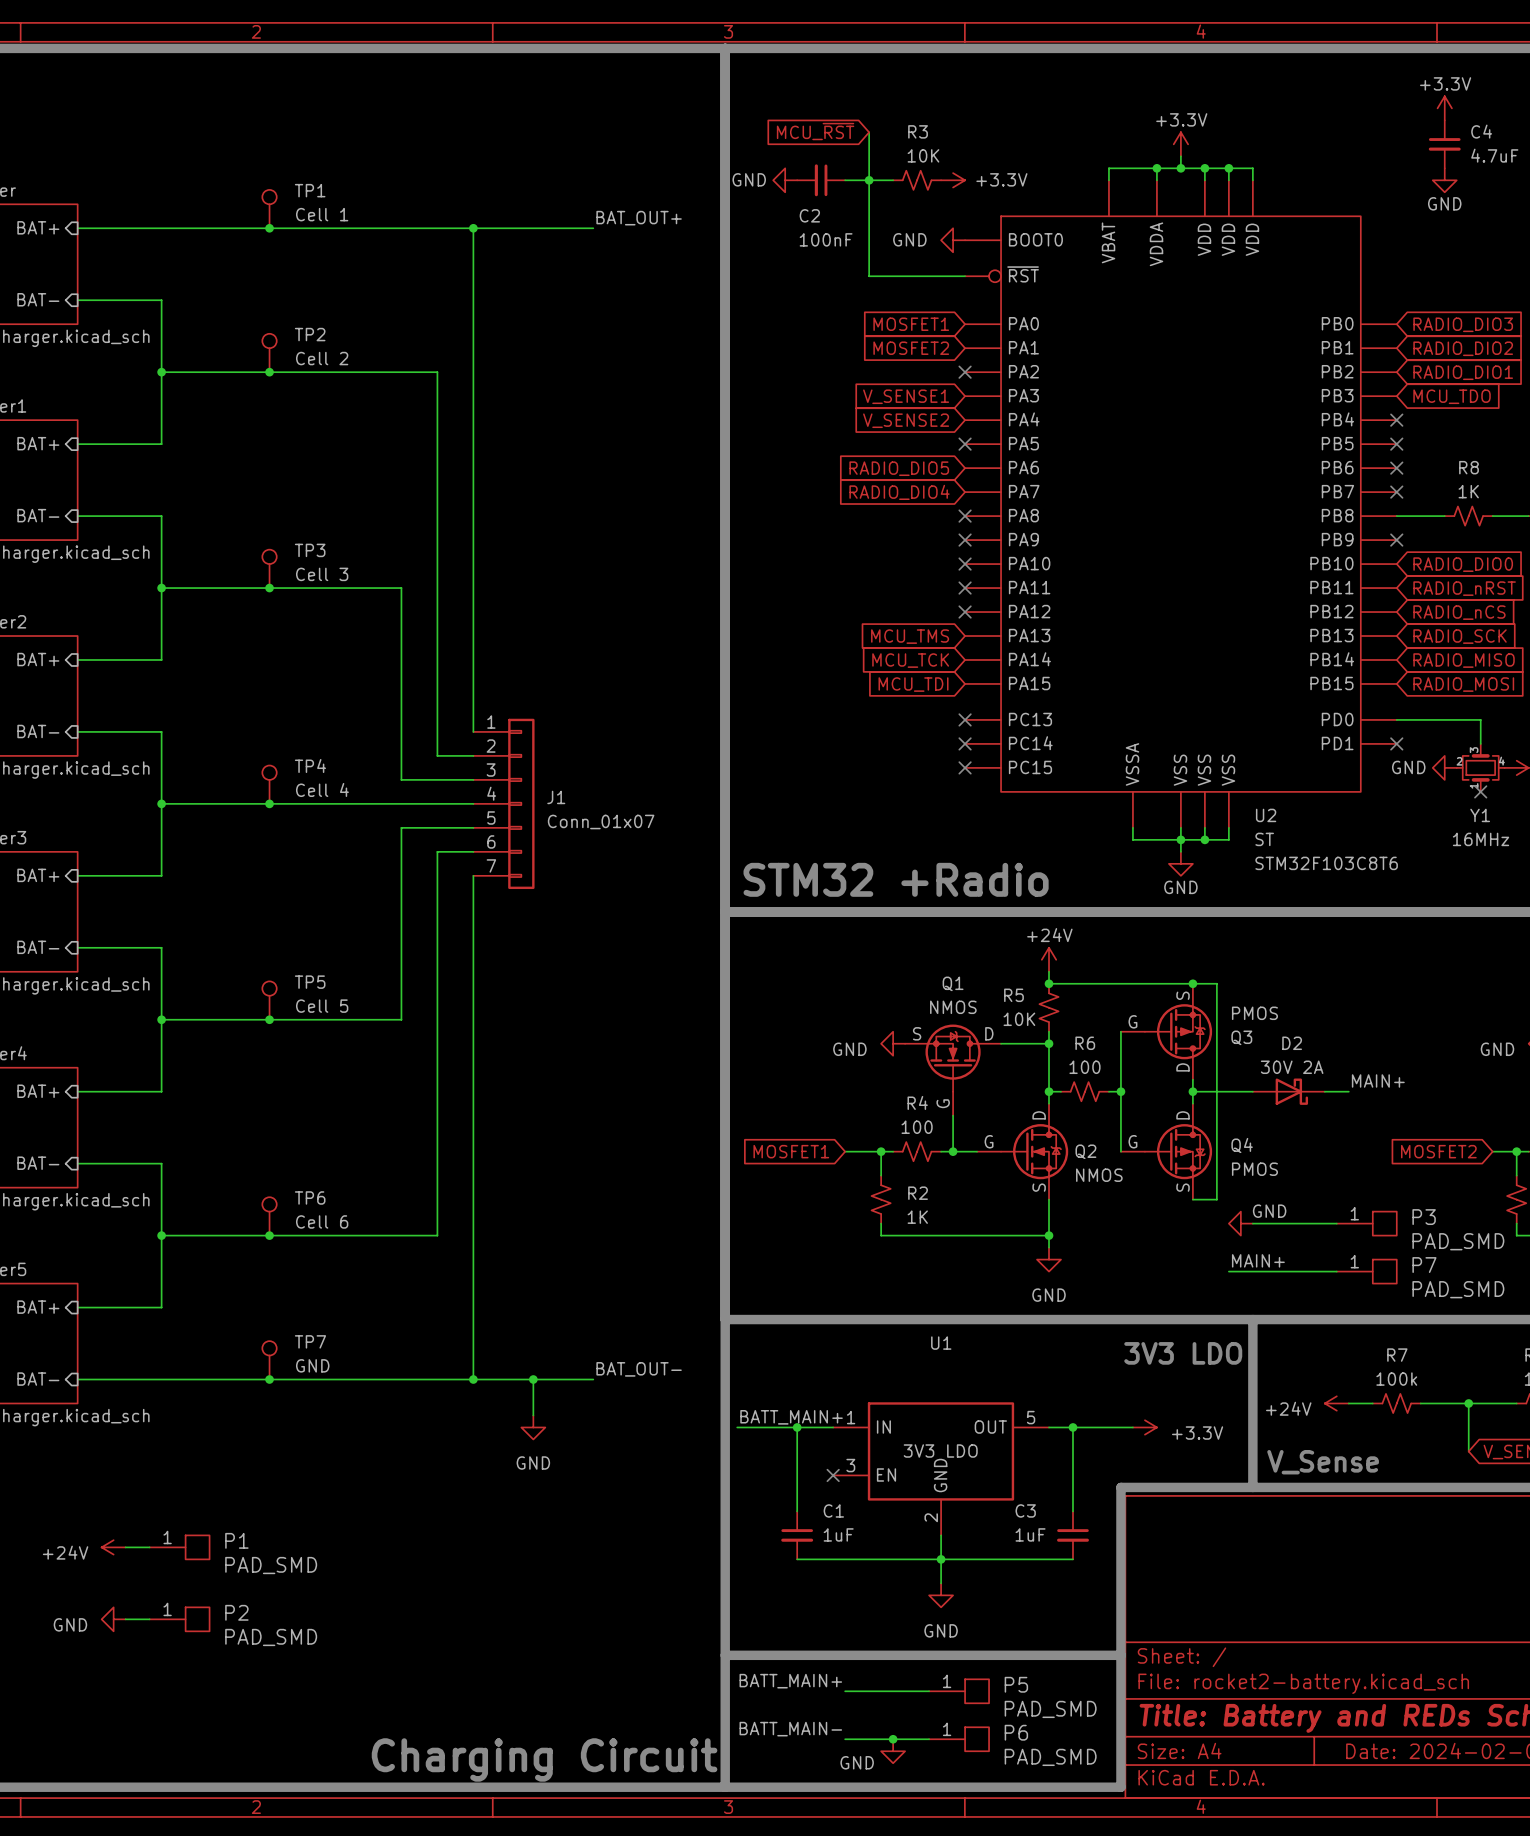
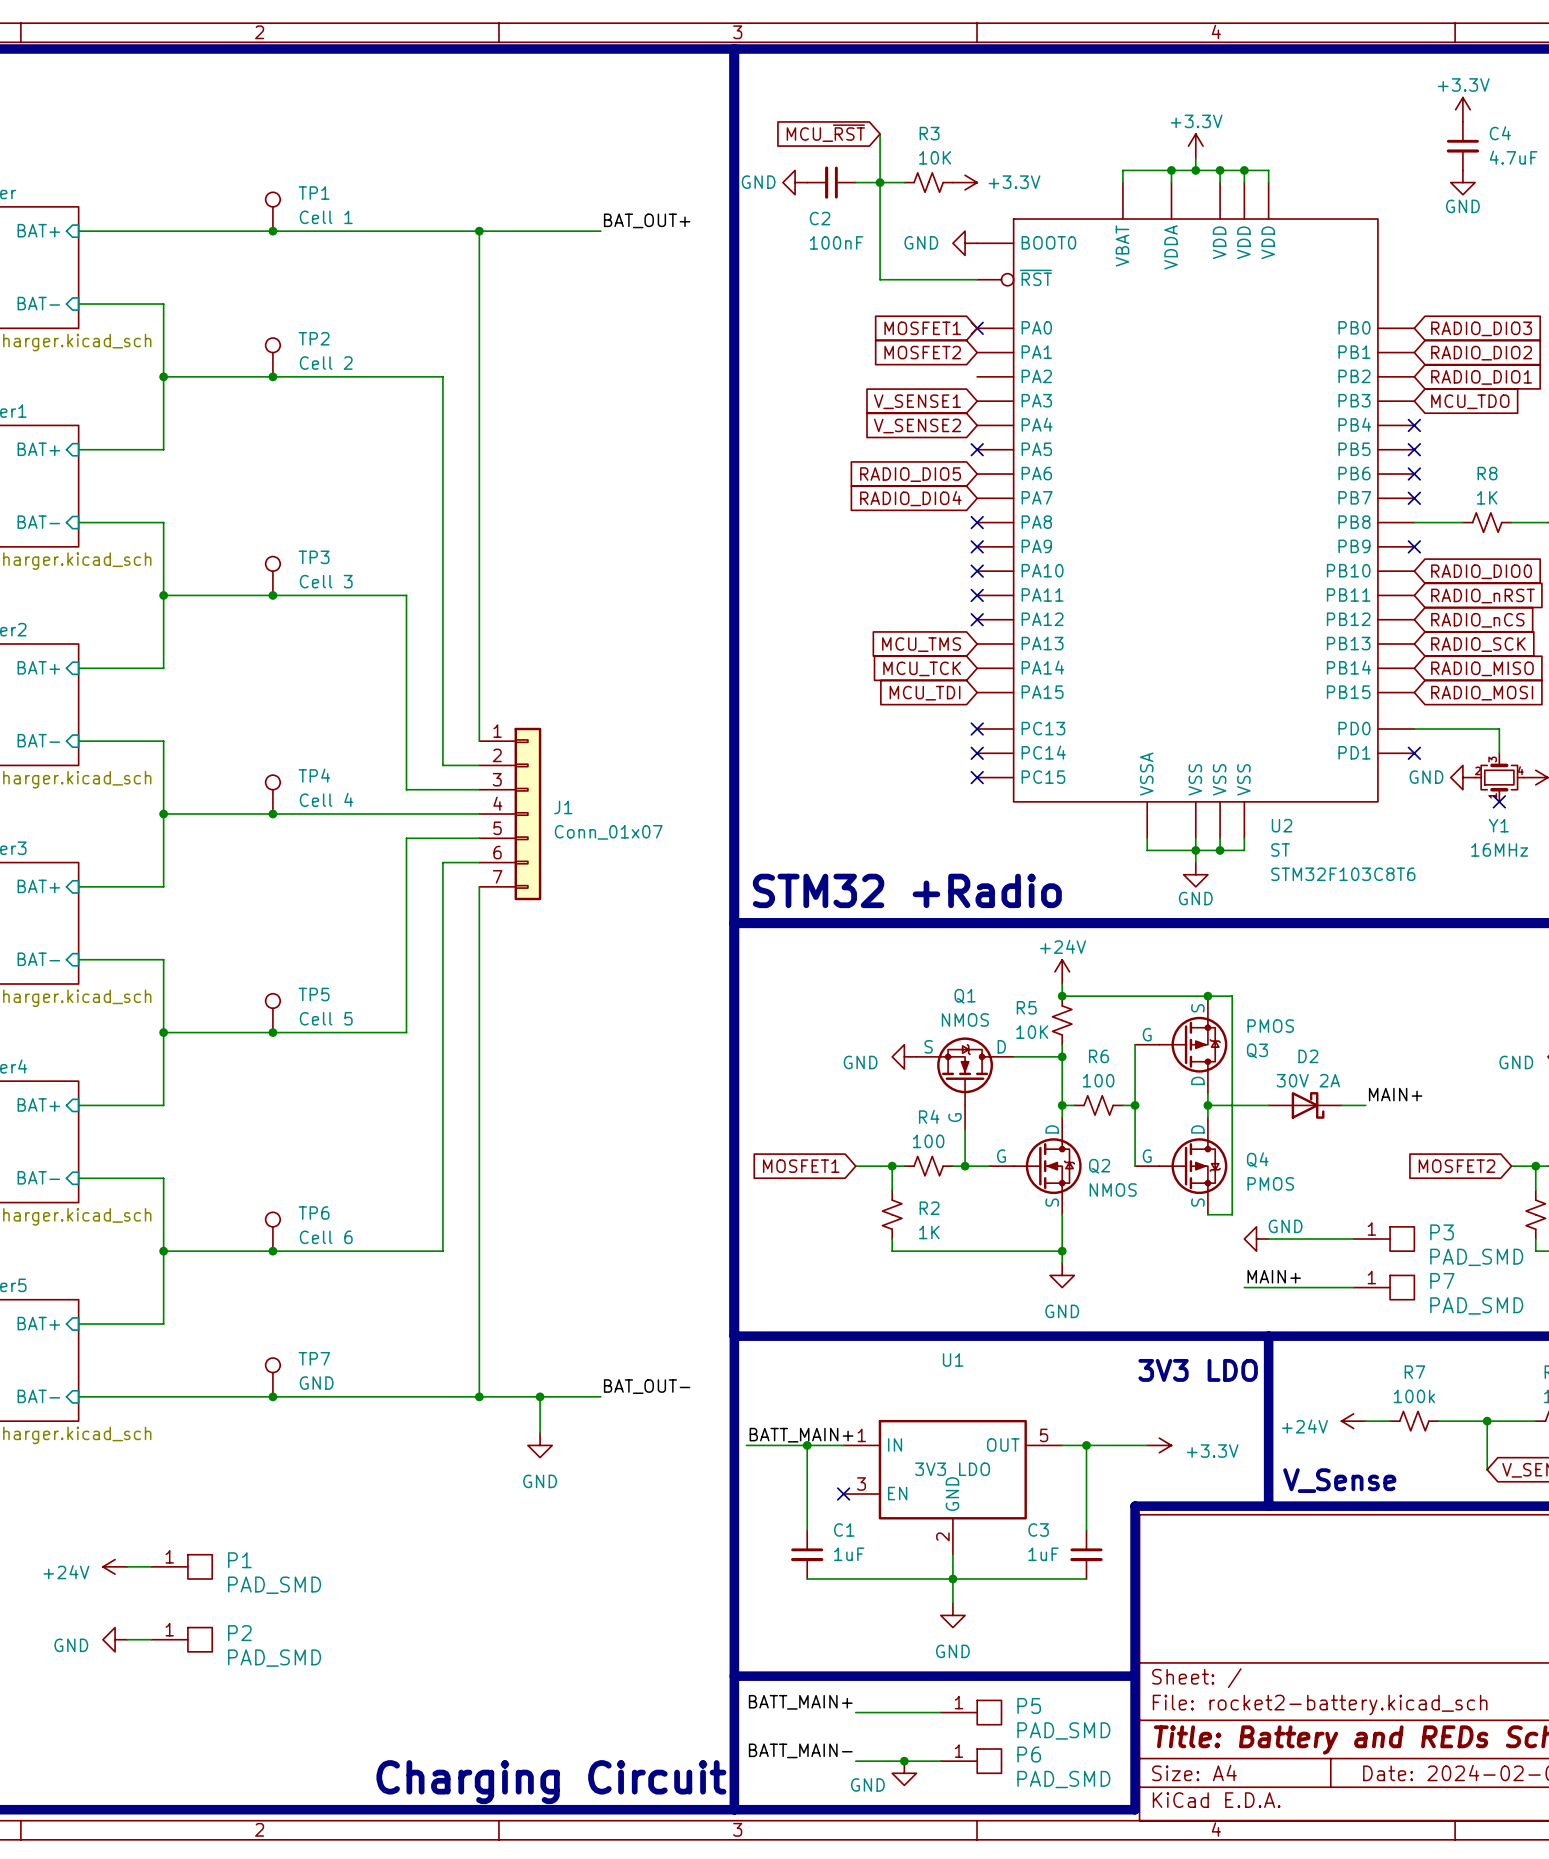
no-connect mark position: (965, 372) -> (977, 328)

